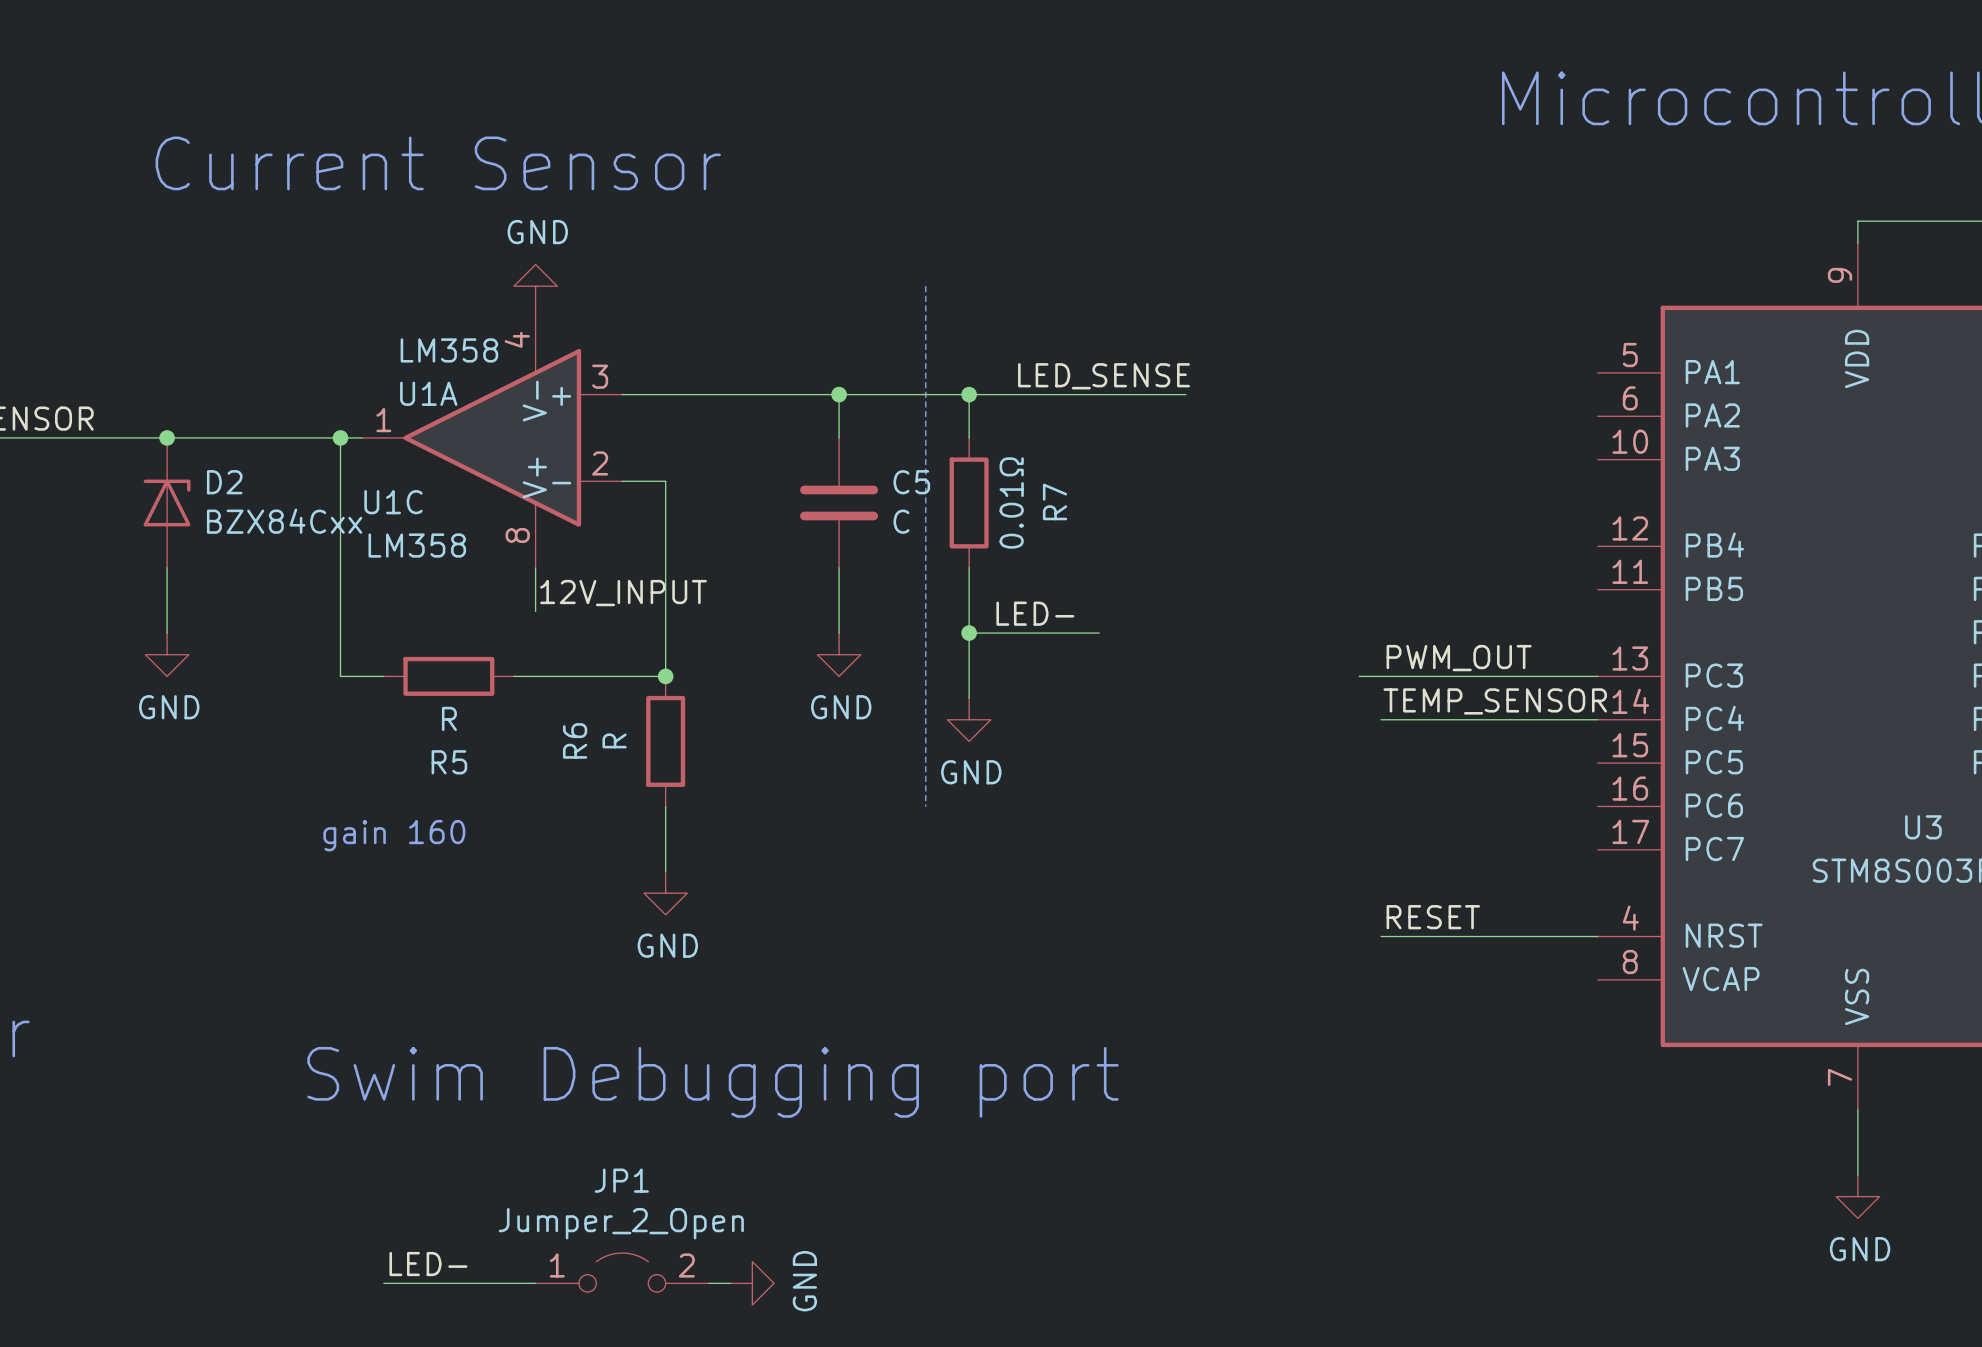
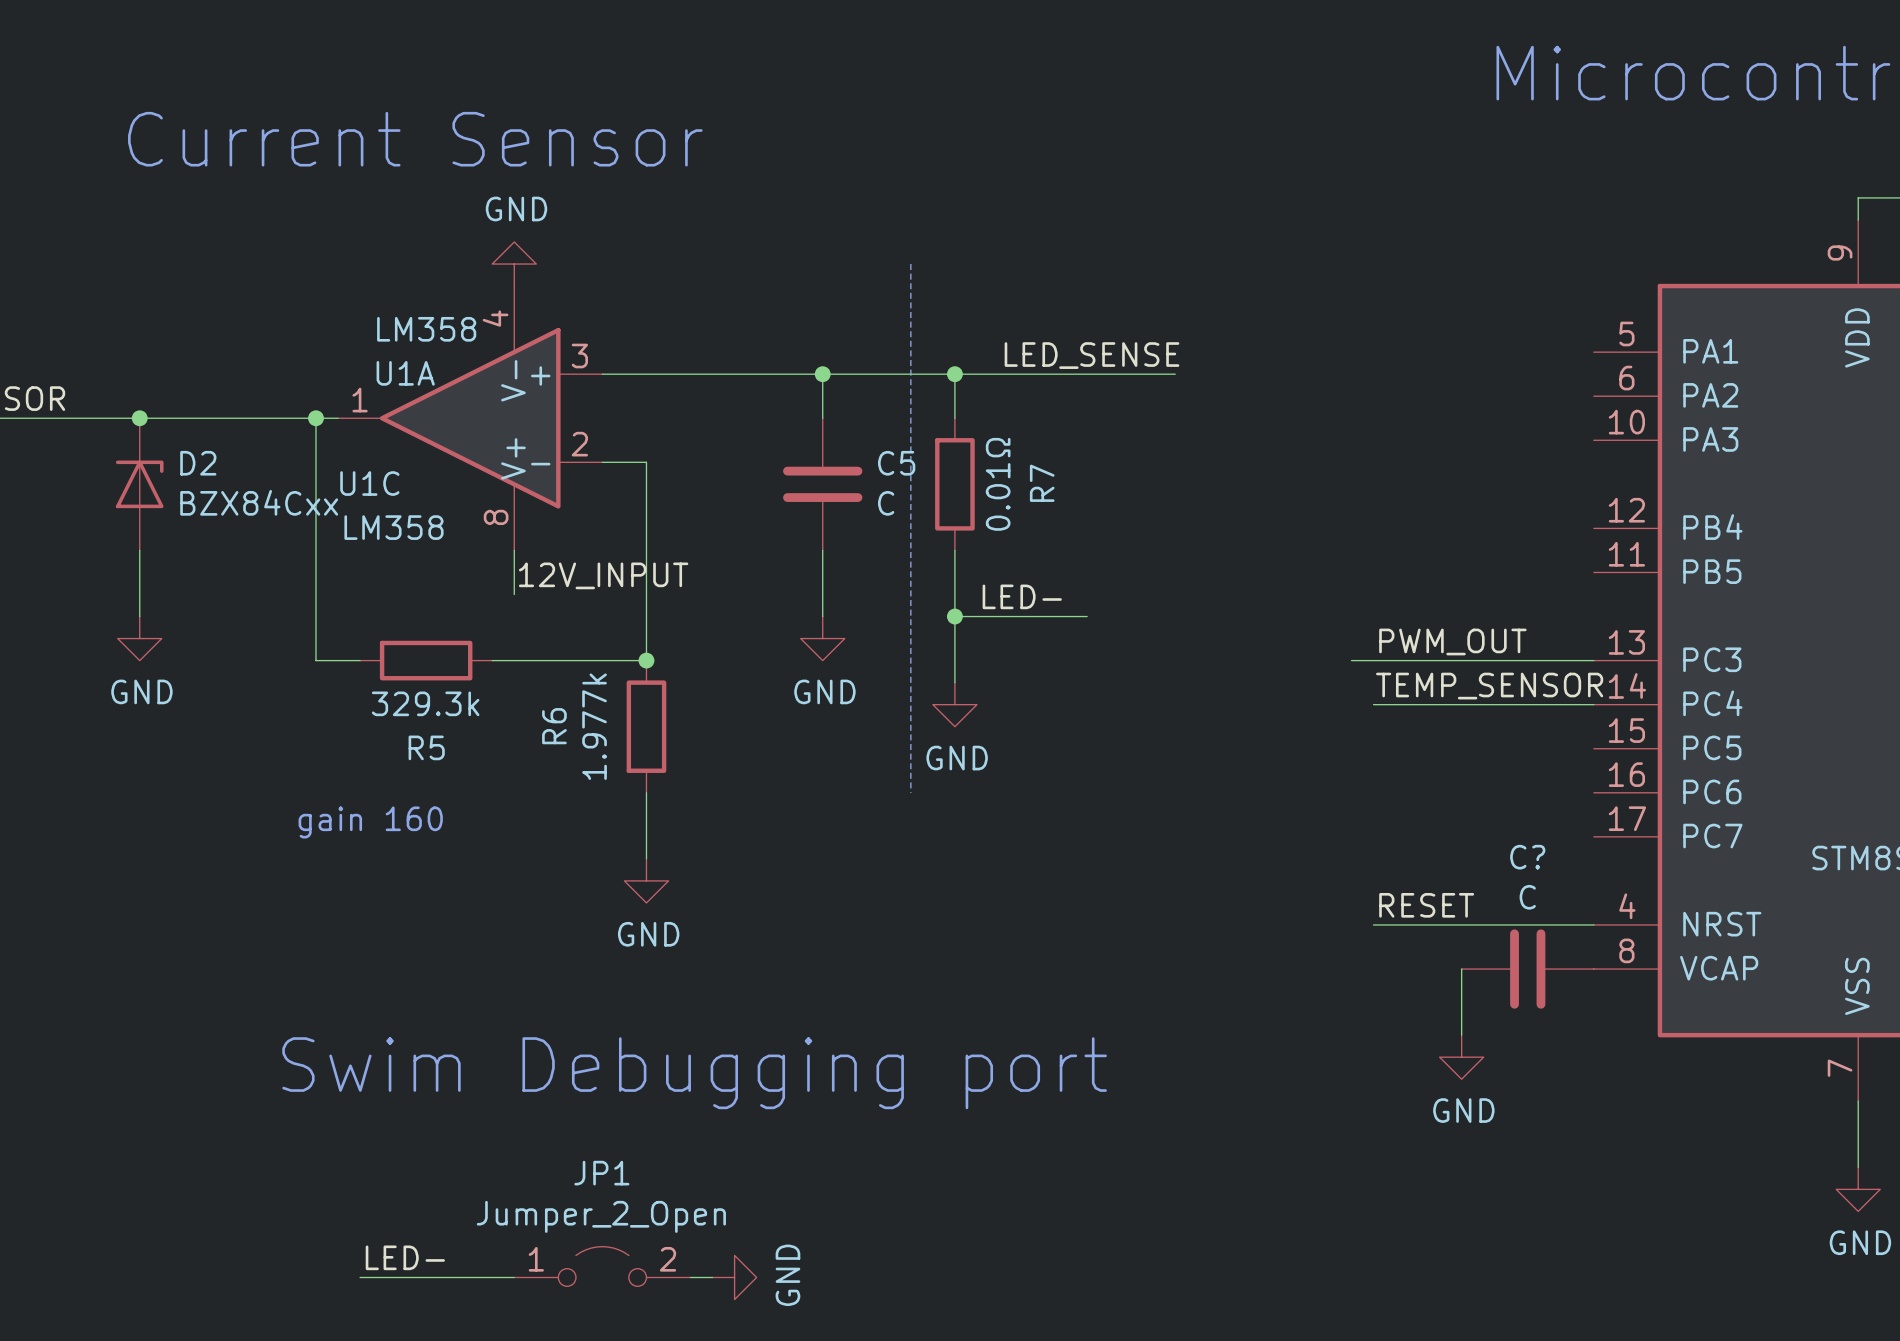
R5 value: R (449, 718) -> 329.3k (425, 703)
R6 value: R (614, 740) -> 1.977k (594, 726)
wire: none -> (1461, 969) (1461, 1035)
C?: none -> C (1527, 969)
power symbol: none -> GND (1461, 1057)

